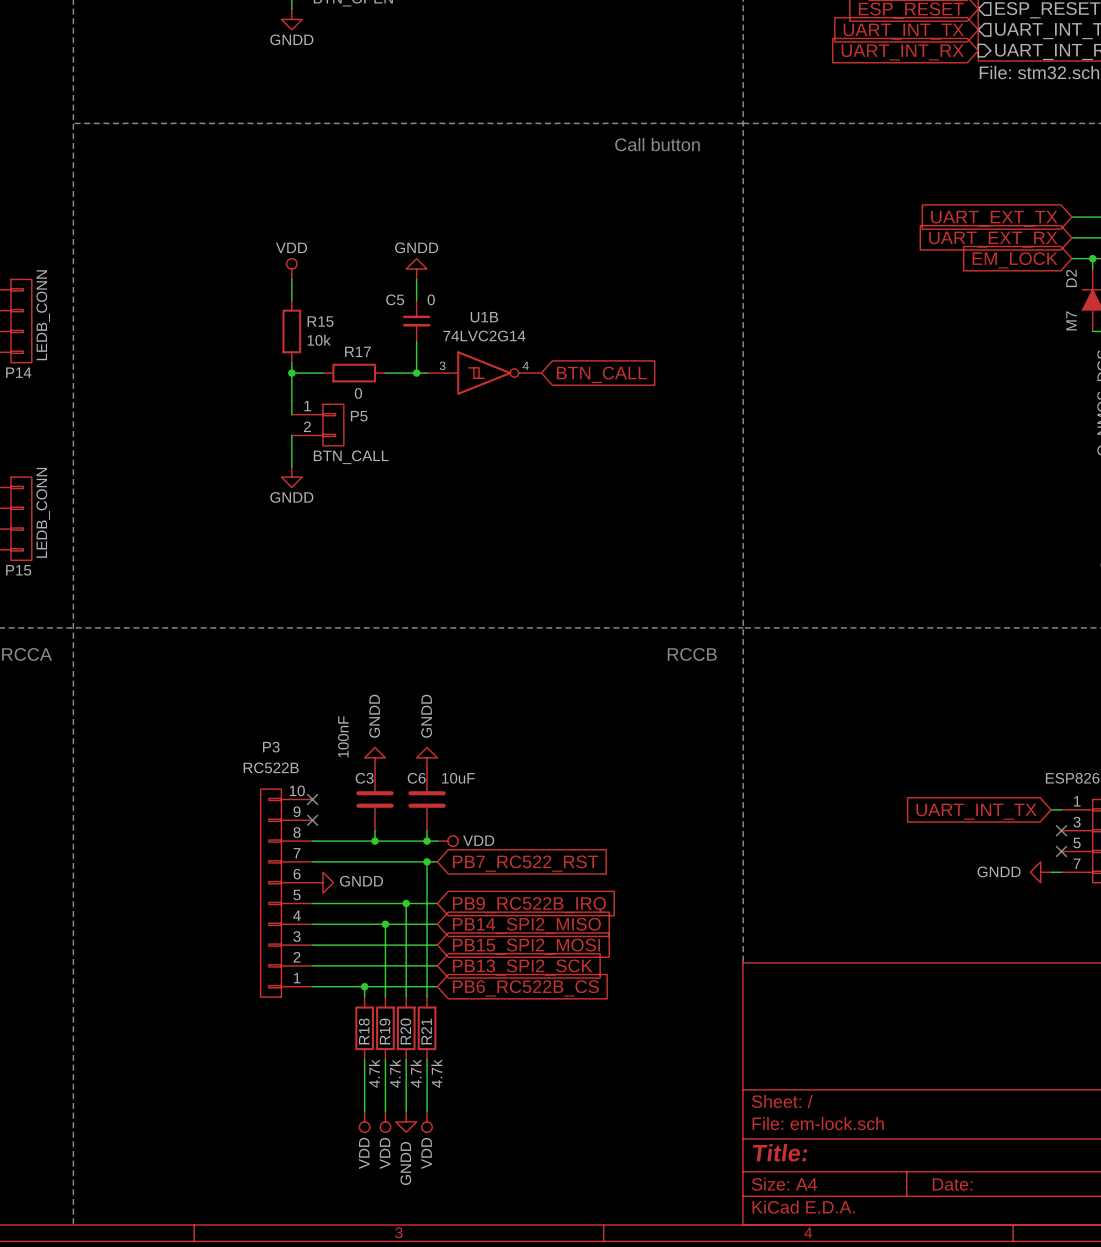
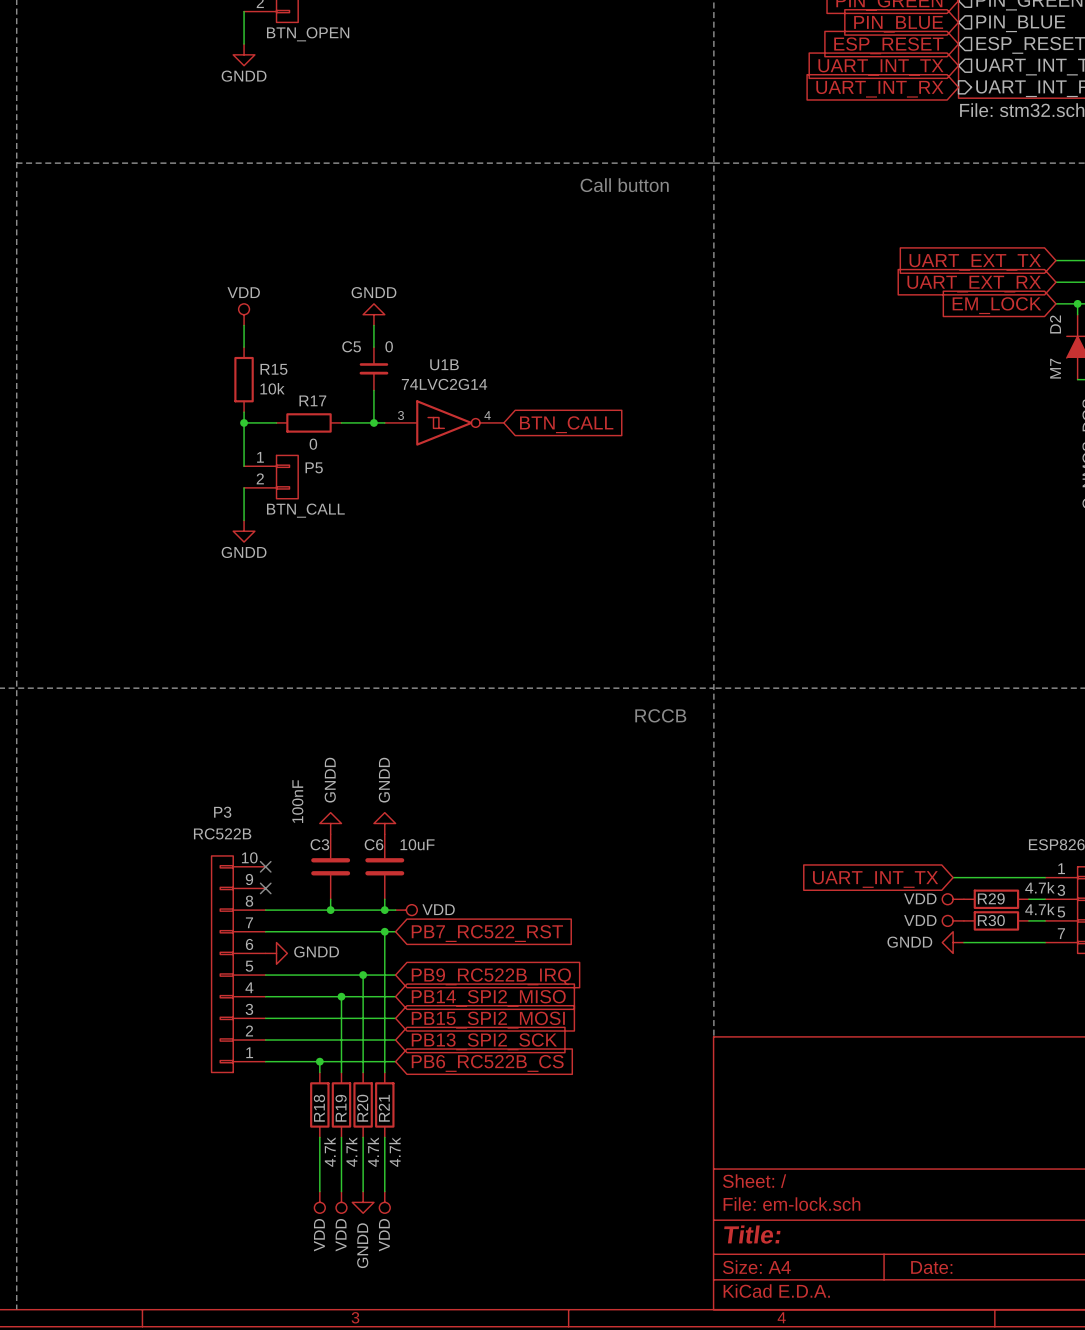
wire: none -> (953, 877) (1034, 877)
global label position: UART_INT_TX (976, 811) -> UART_INT_TX (875, 879)
power symbol: none -> VDD (953, 899)
R29: none -> 4.7k (996, 899)
wire: none -> (1028, 899) (1045, 899)
no-connect mark: (1061, 830) -> none
power symbol: none -> VDD (953, 920)
R30: none -> 4.7k (996, 920)
wire: none -> (1028, 920) (1045, 920)
no-connect mark: (1061, 851) -> none
wire: none -> (963, 942) (1034, 942)
power symbol position: GNDD (1040, 872) -> GNDD (953, 942)

